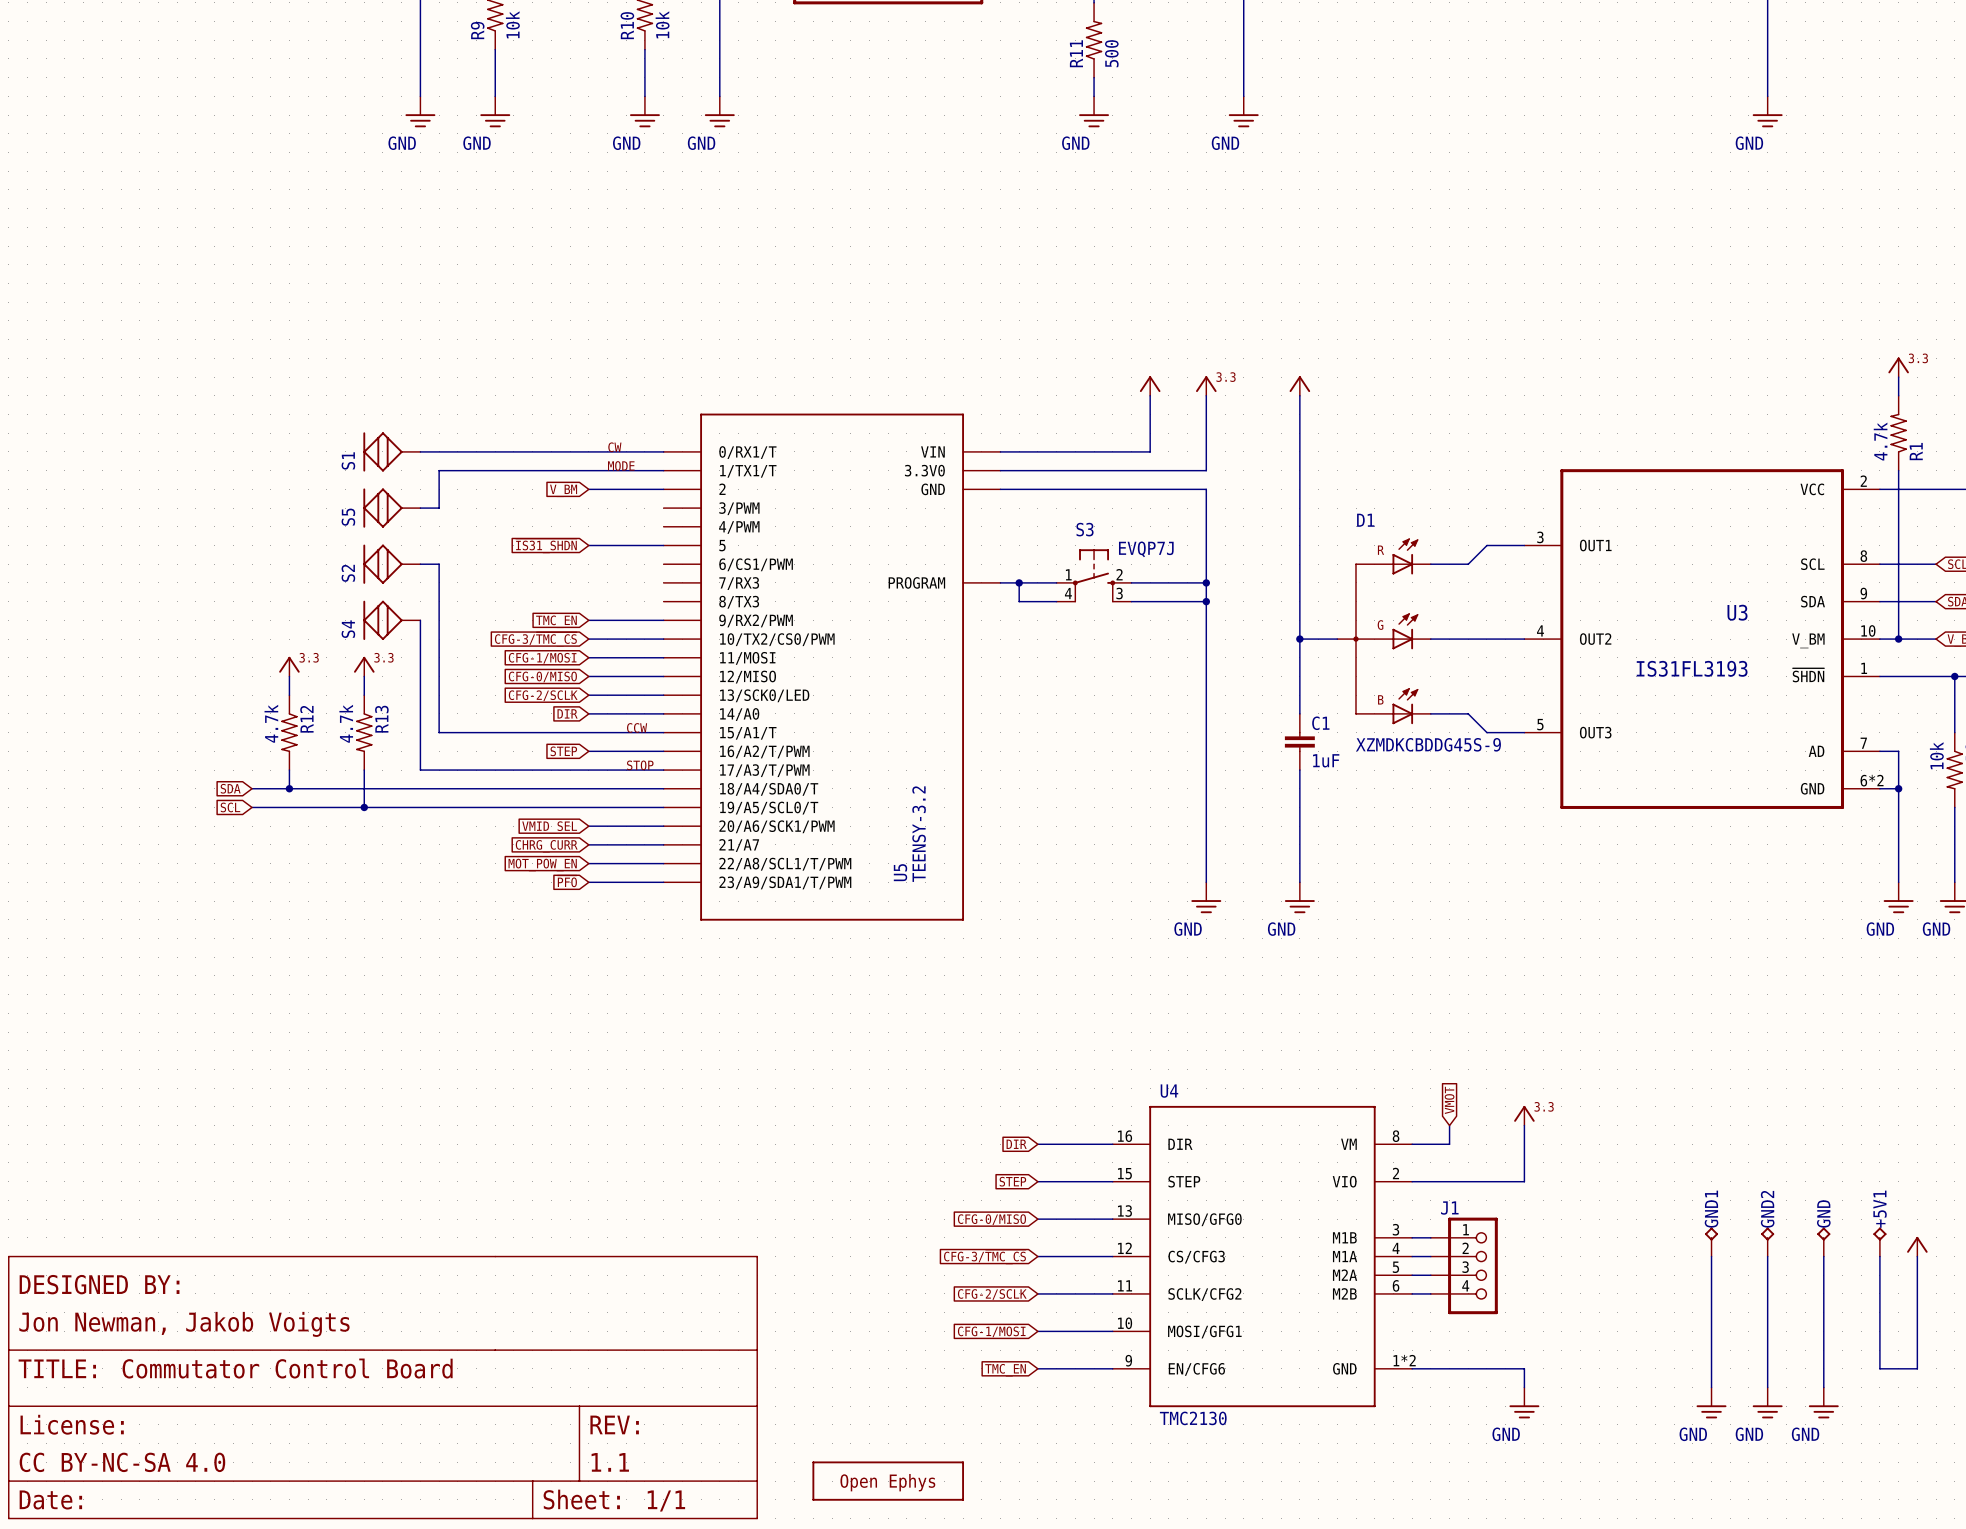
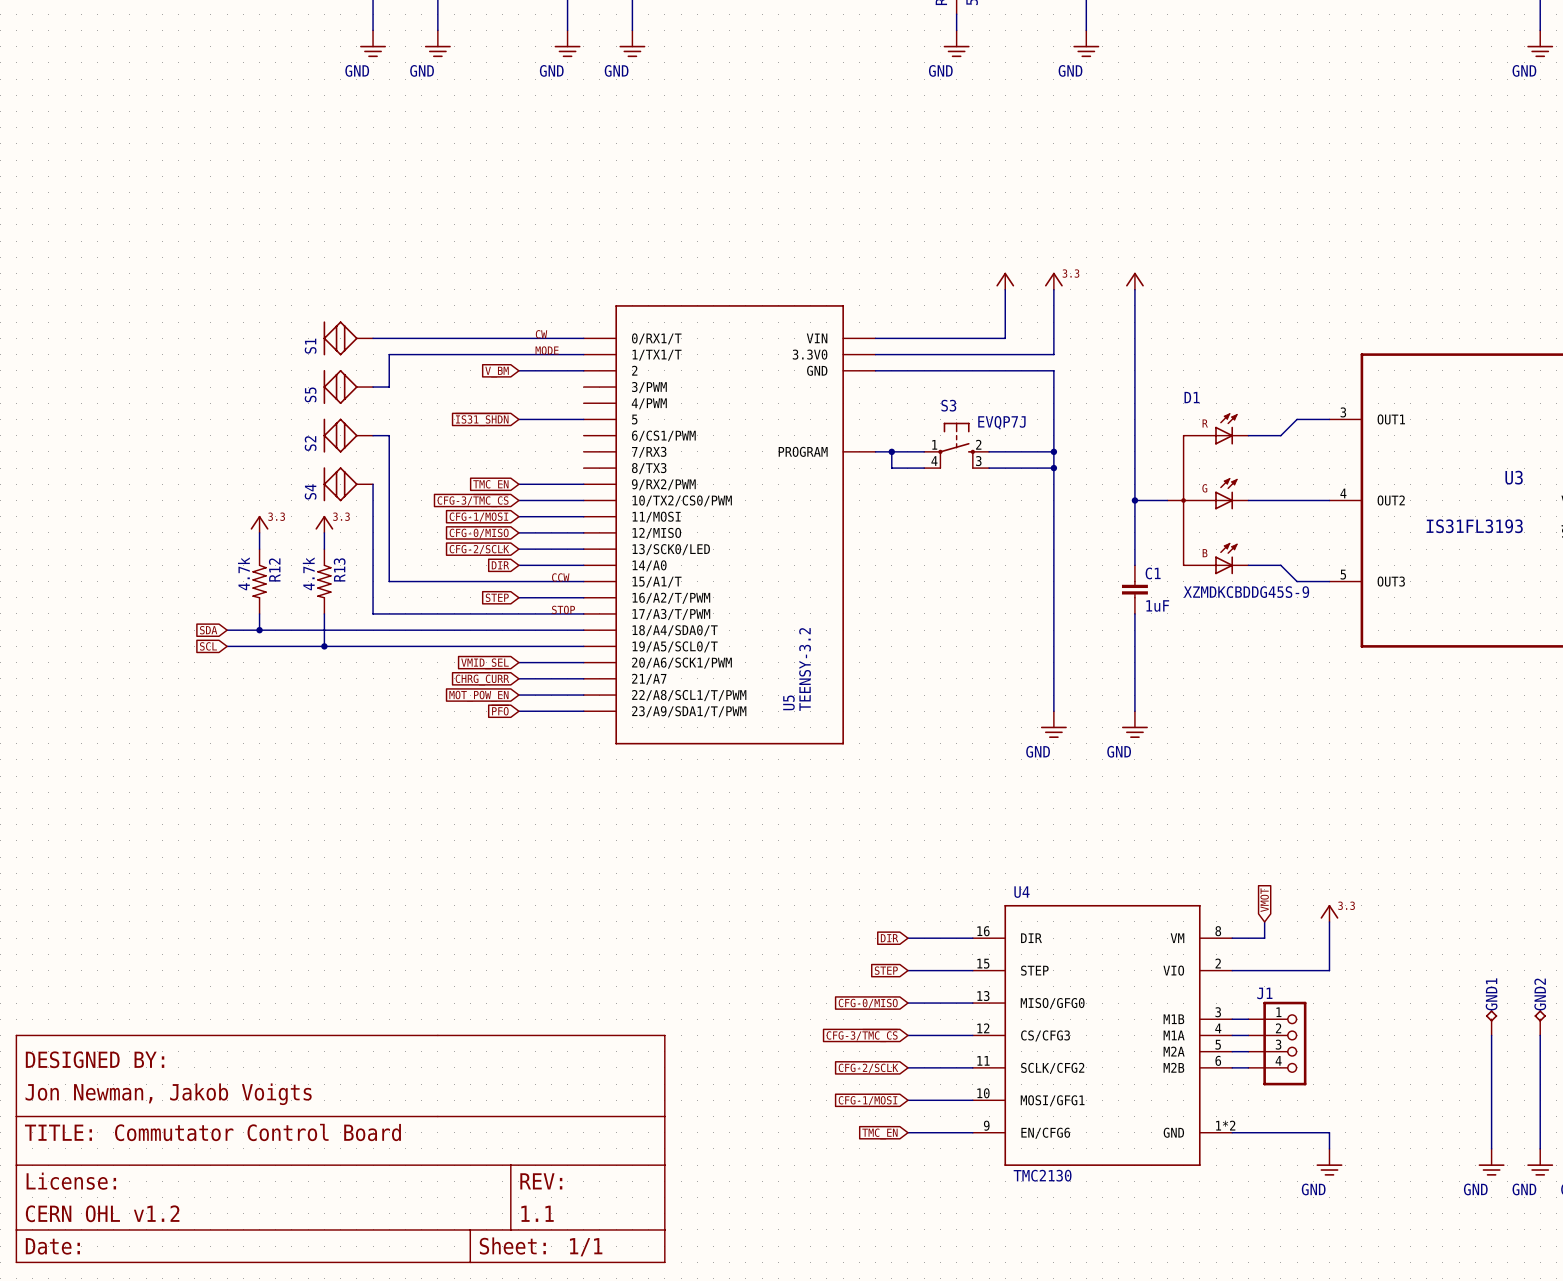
part text: CC BY-NC-SA 4.0 (122, 1462) -> CERN OHL v1.2 (102, 1213)
part: (888, 1481) -> none

